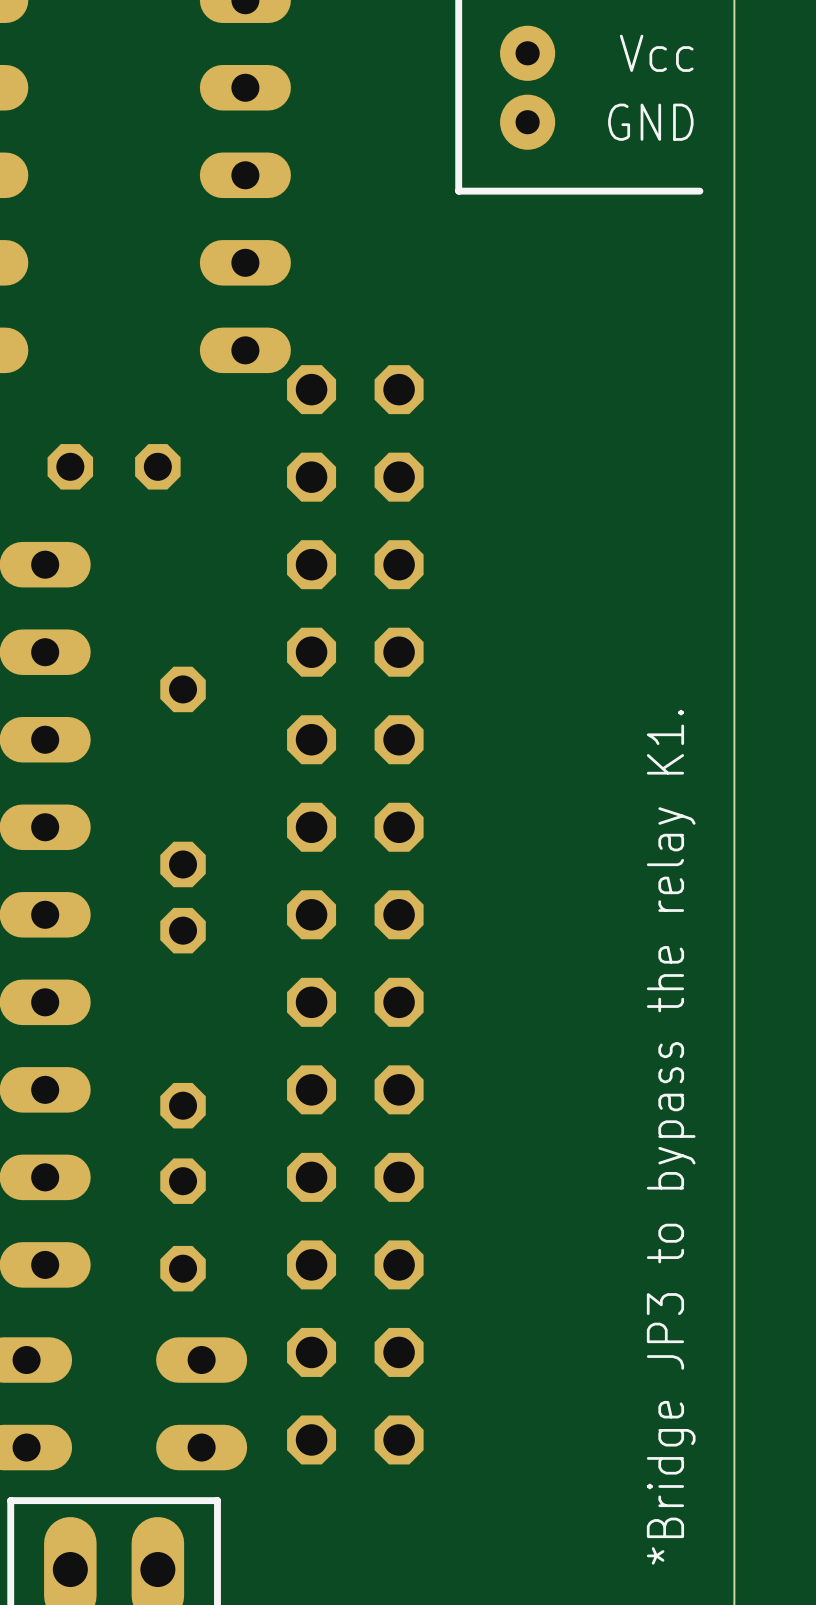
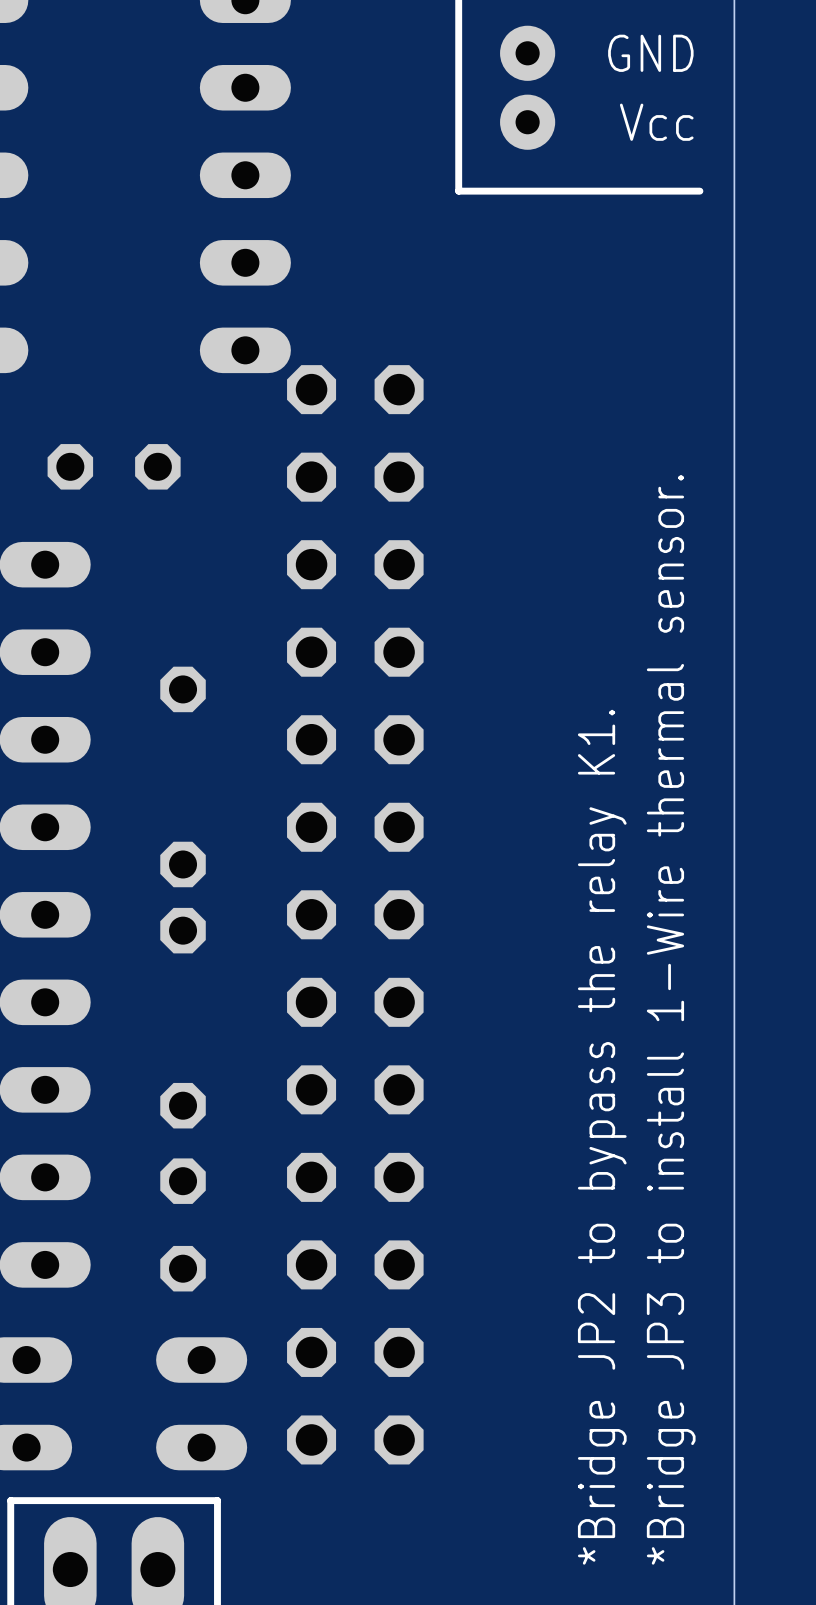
text: Vcc (656, 53) -> GND (650, 53)
text: GND (650, 122) -> Vcc (656, 122)
text: none -> *Bridge JP2 to bypass the relay K1. (602, 1137)
text: *Bridge JP3 to bypass the relay K1. (671, 1137) -> *Bridge JP3 to install 1-Wire thermal sensor. (671, 1019)

